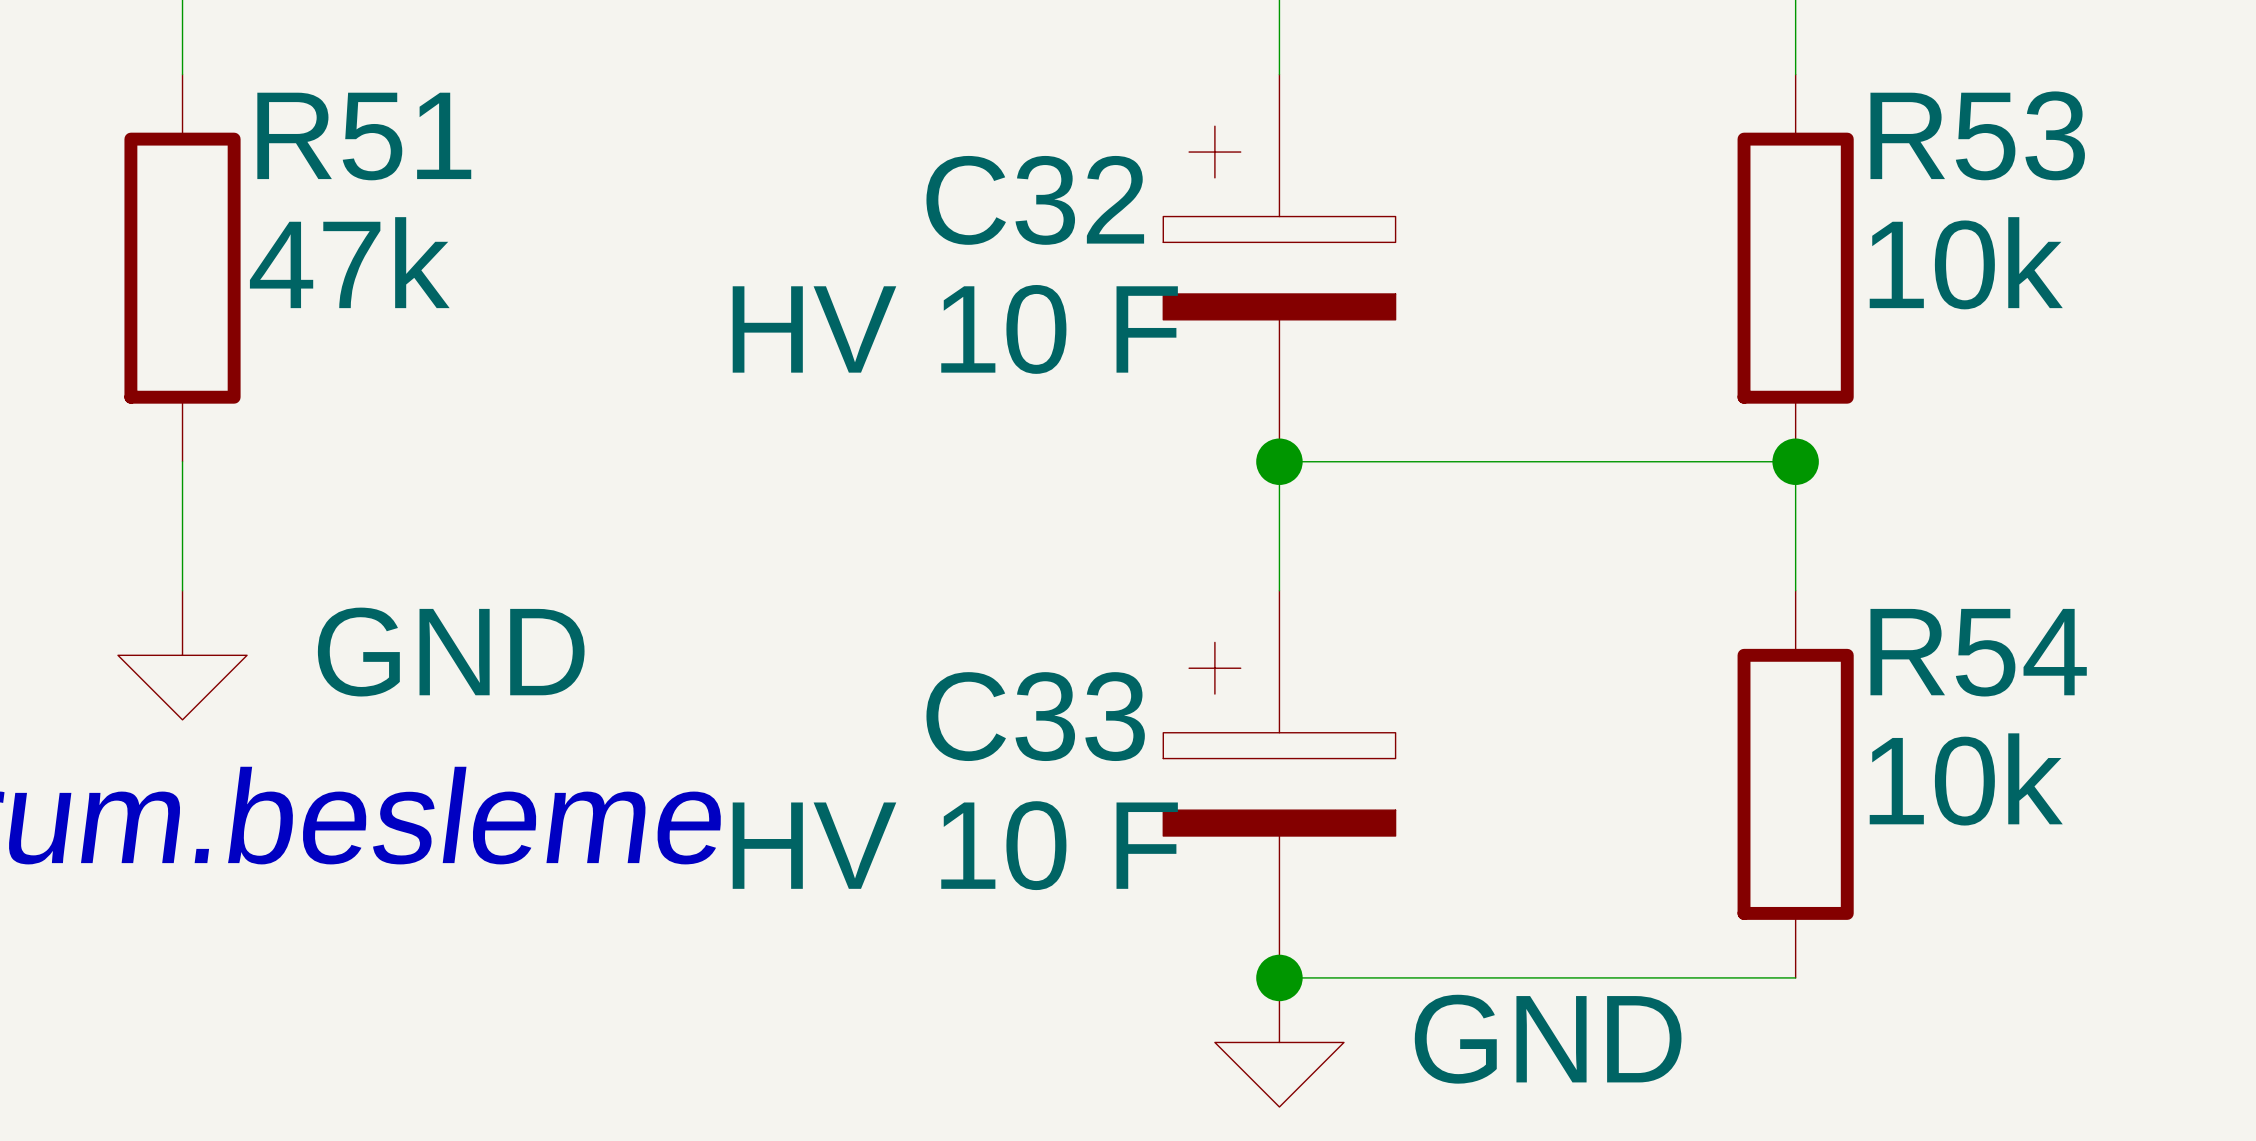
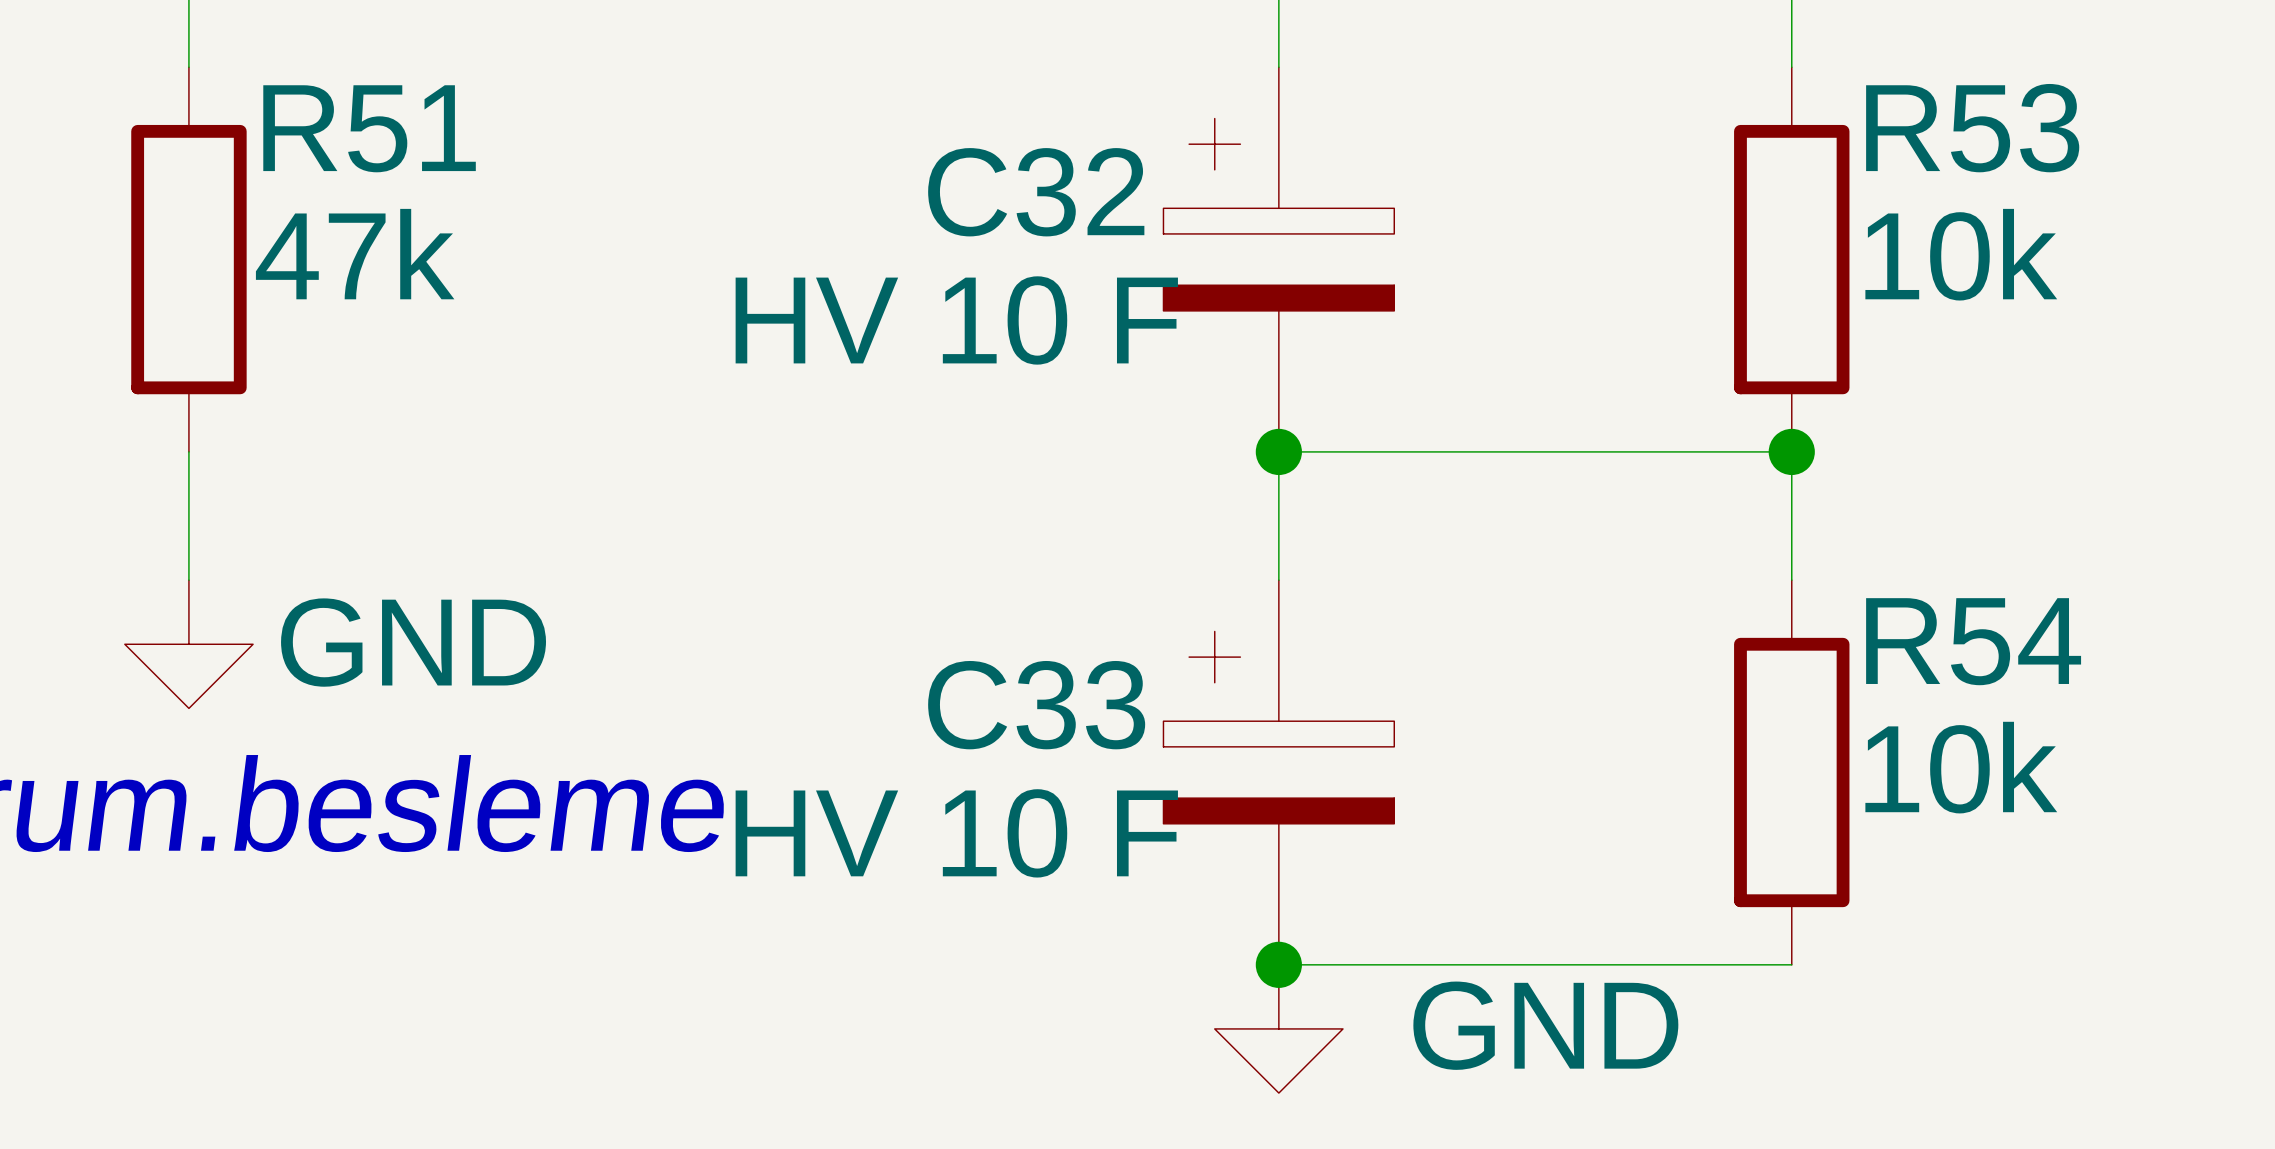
power symbol text position: GND (451, 652) -> GND (413, 642)

